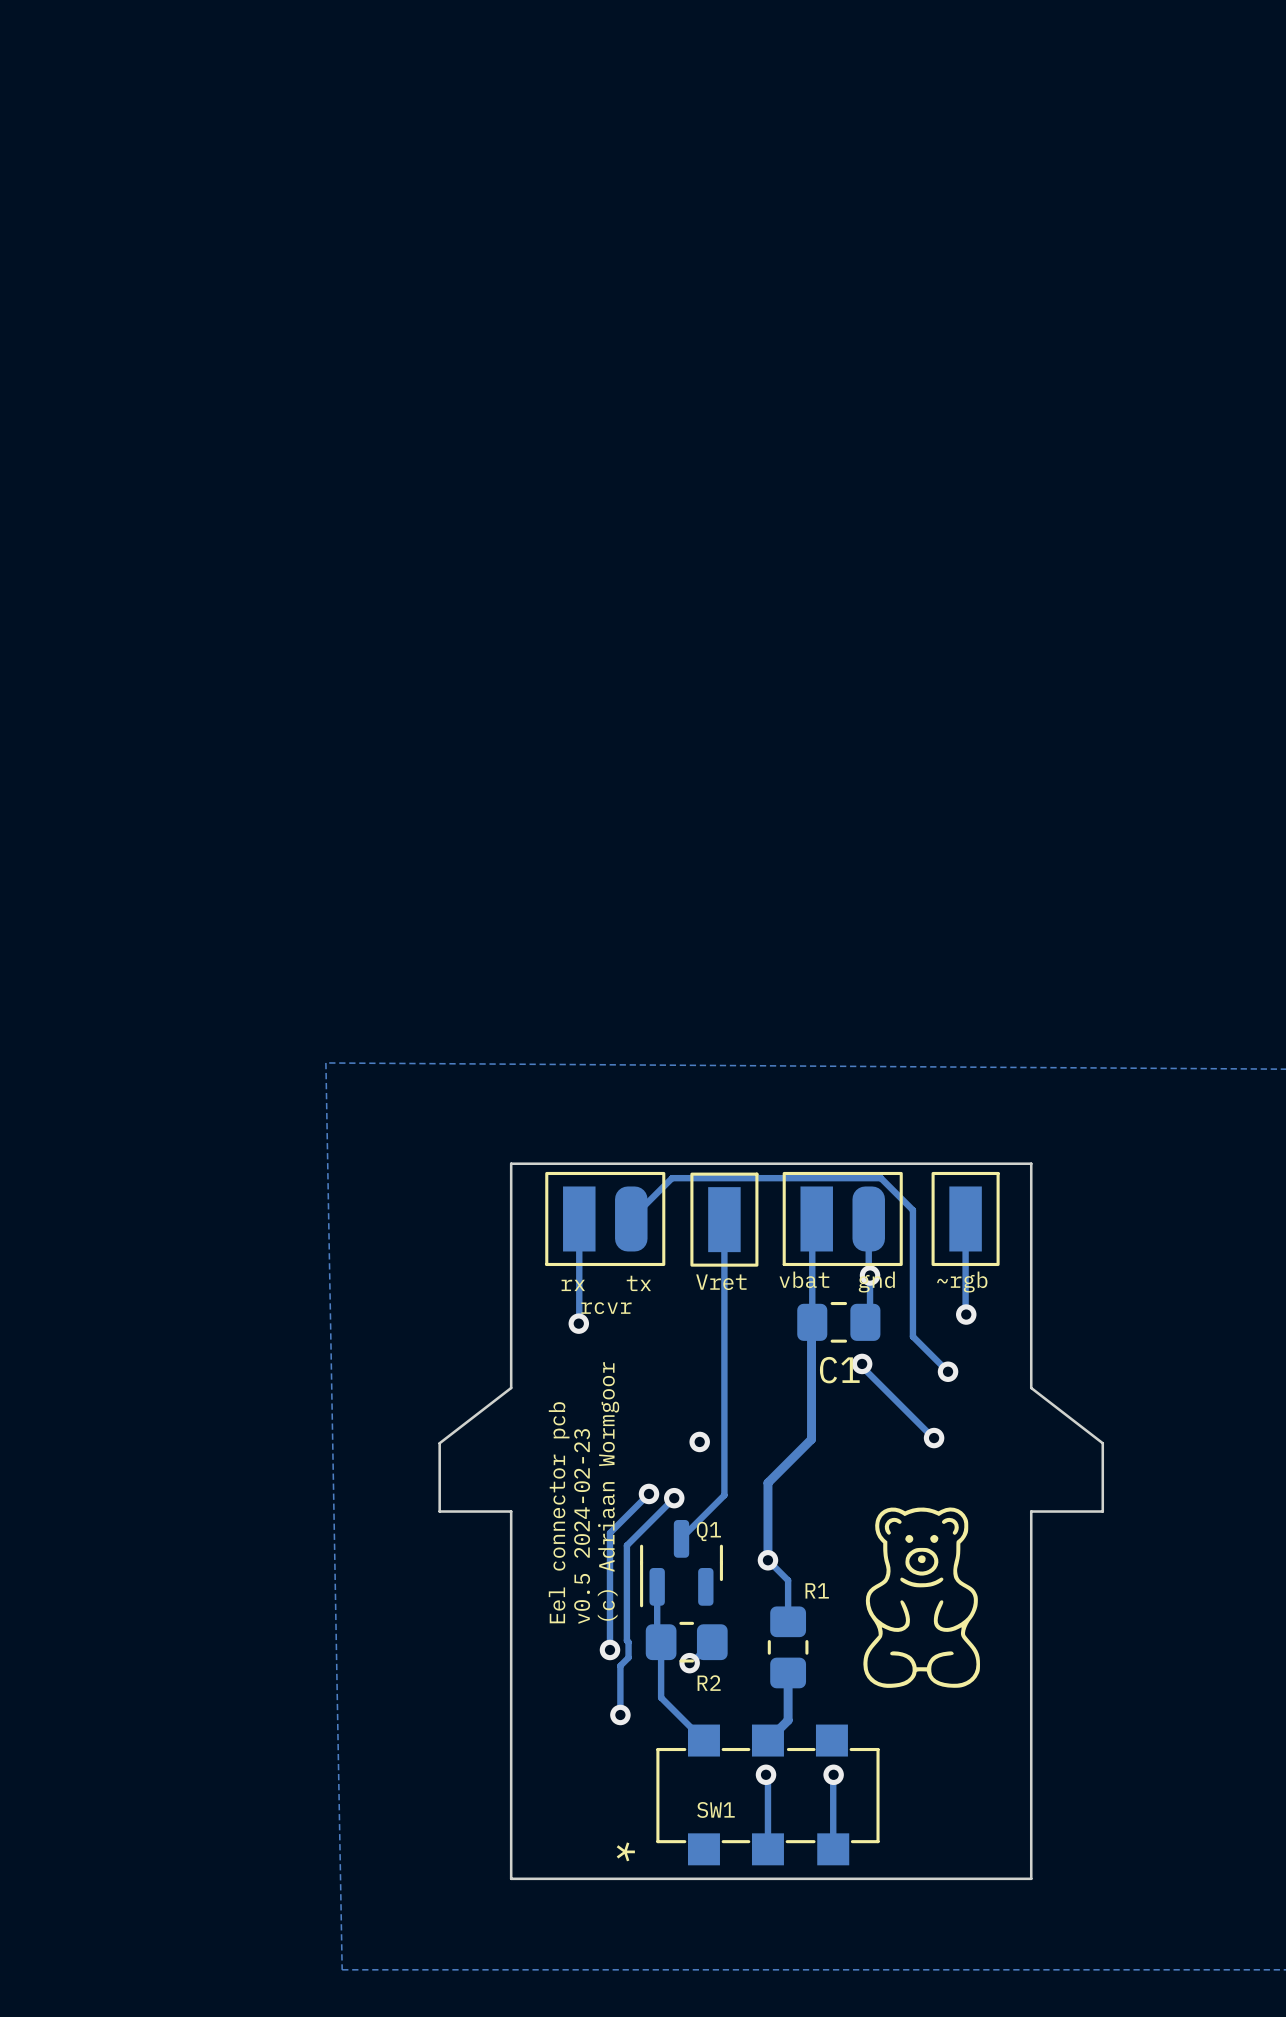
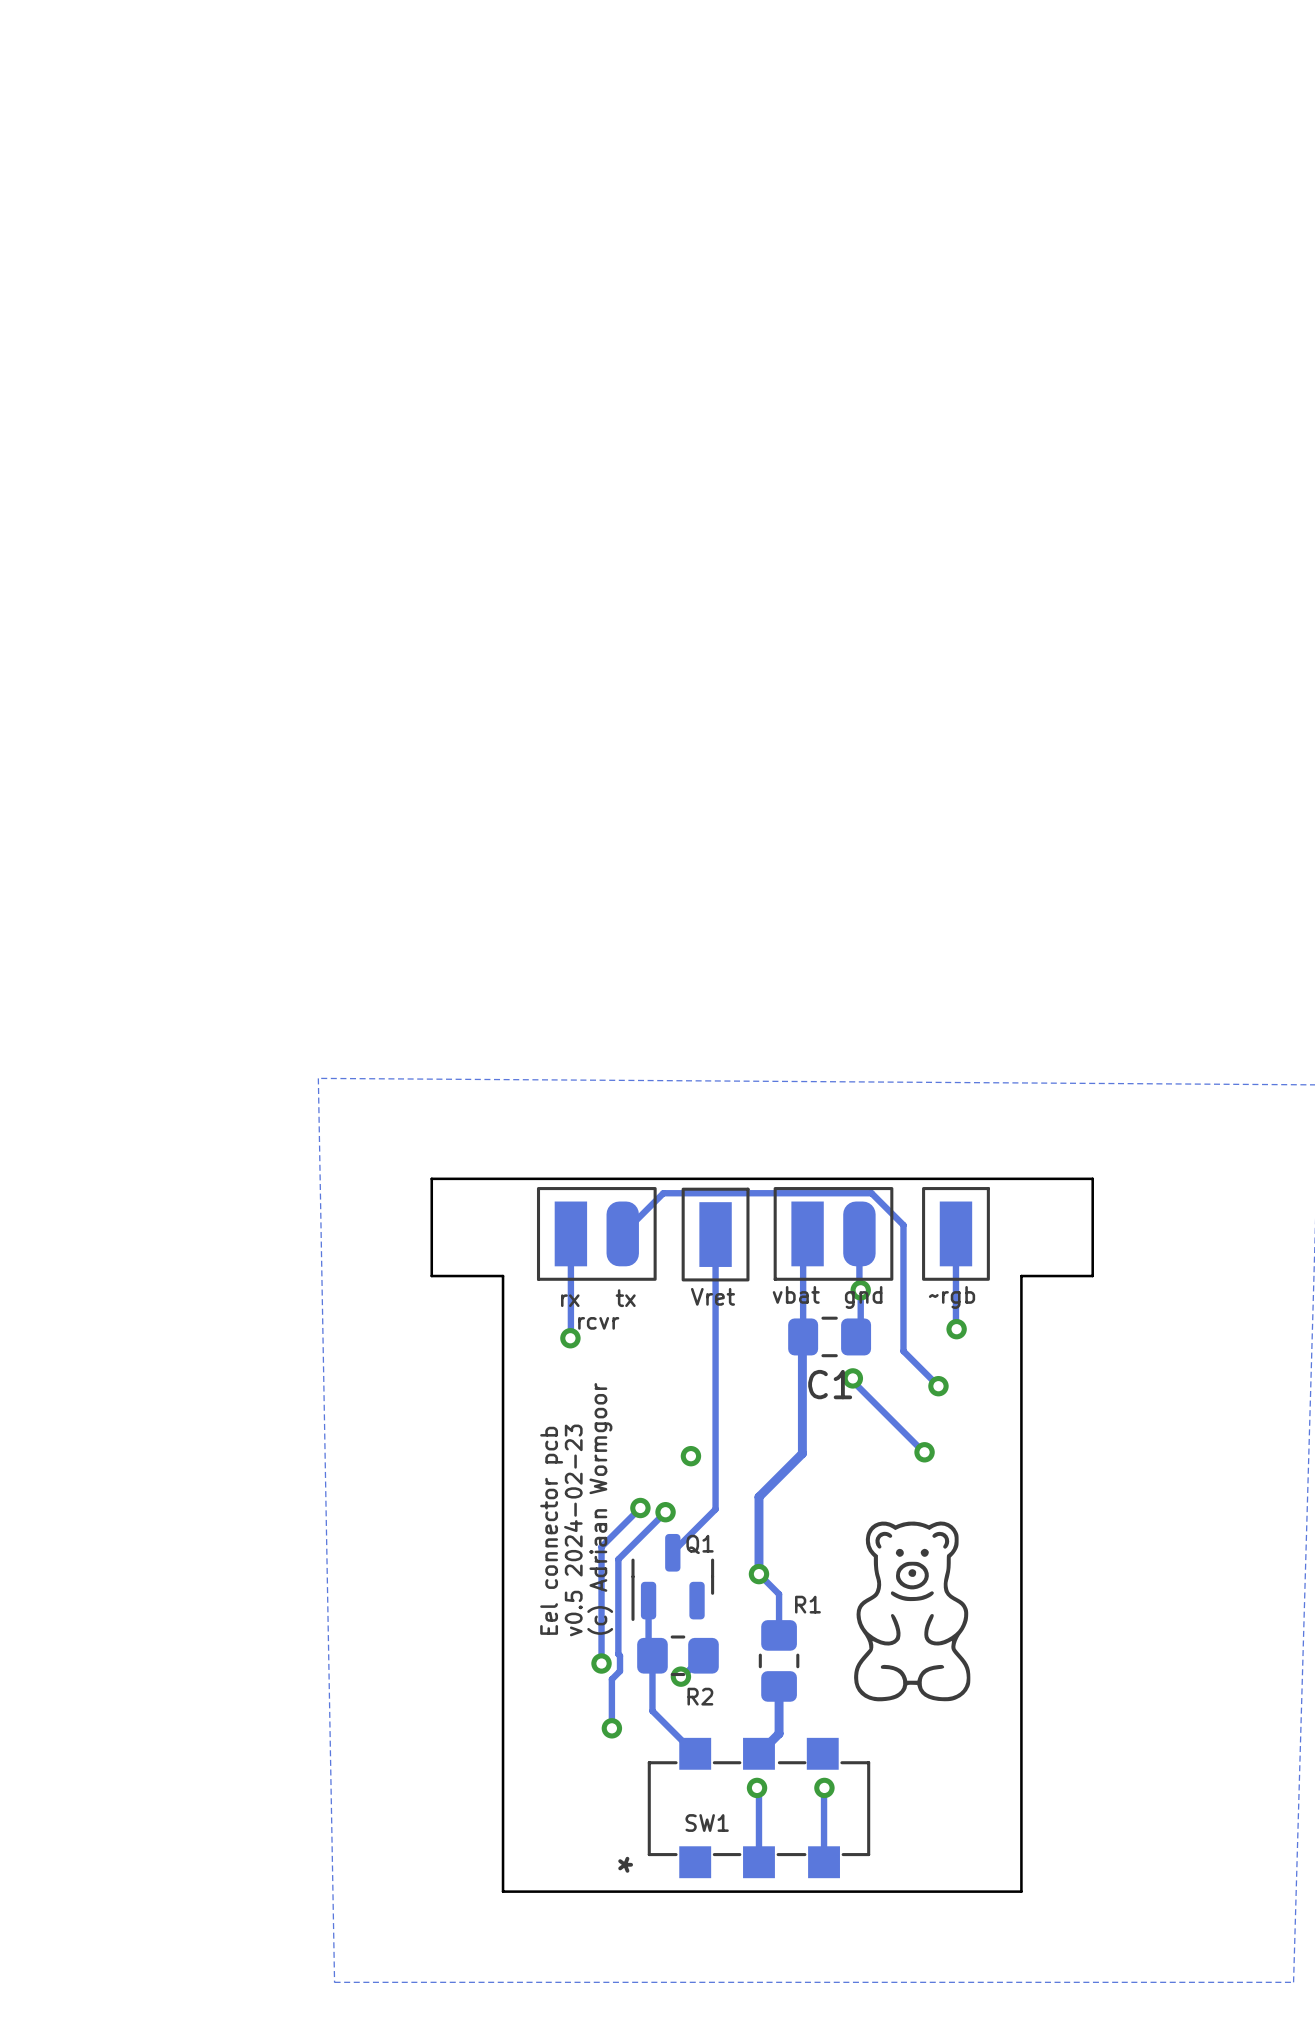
board edge: (511, 1163) (511, 1261) -> (503, 1178) (431, 1178) (431, 1276) (503, 1276)
board edge: (1031, 1163) (1031, 1261) -> (1021, 1178) (1092, 1178) (1092, 1276) (1021, 1276)
board edge: (511, 1388) (439, 1443) (439, 1511) (511, 1511) -> (503, 1402) (503, 1525)
board edge: (1031, 1388) (1102, 1443) (1102, 1511) (1031, 1511) -> (1021, 1402) (1021, 1525)

